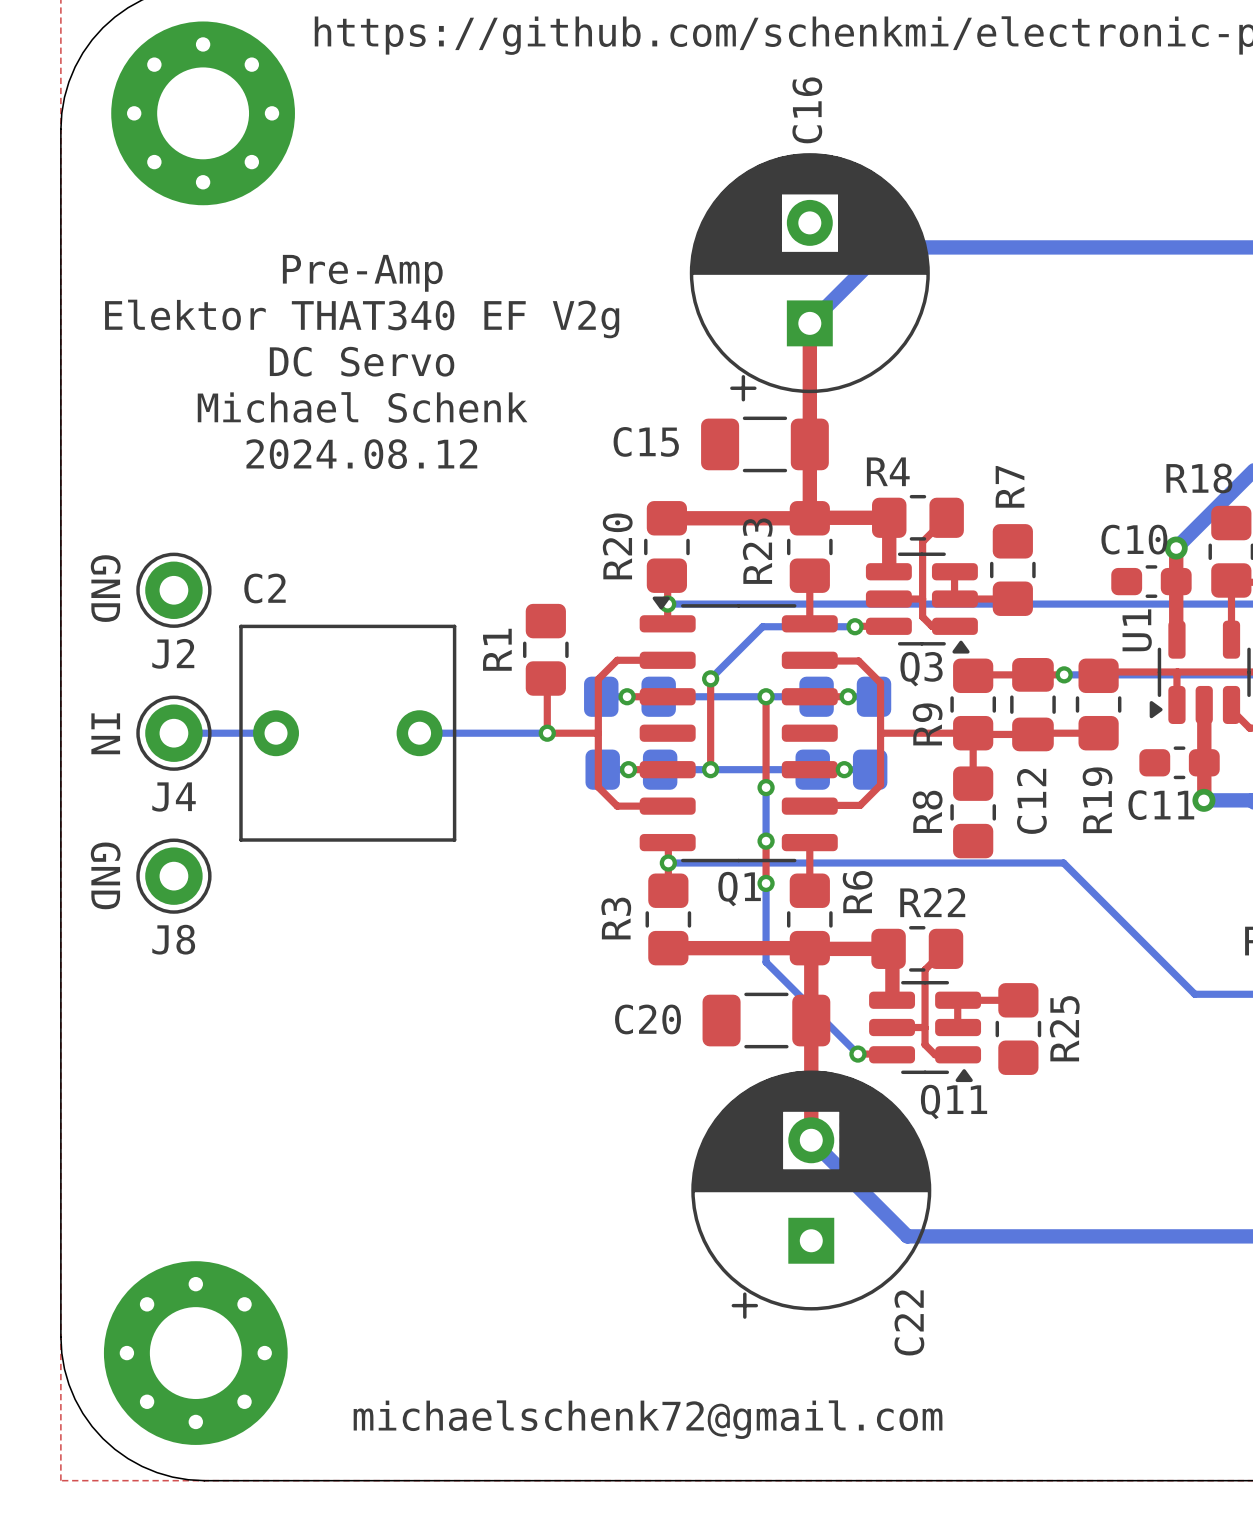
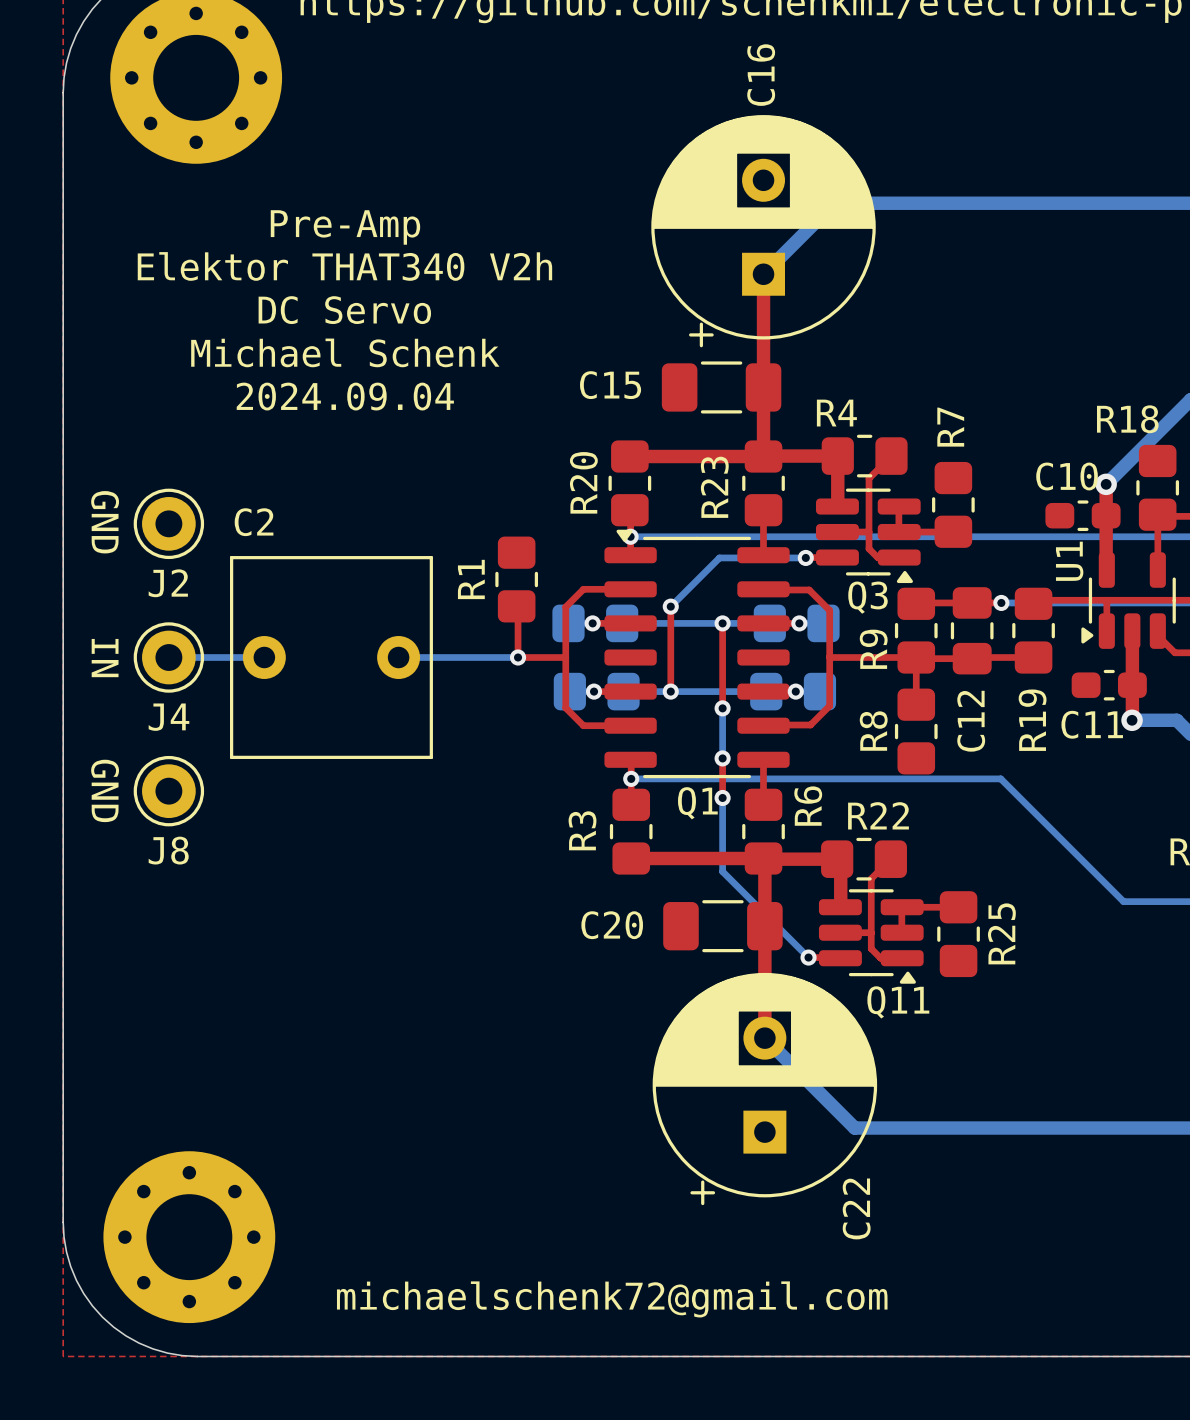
text: Elektor THAT340 EF V2g (362, 318) -> Elektor THAT340 V2h (344, 266)
text: 2024.08.12 (361, 454) -> 2024.09.04 (345, 396)

